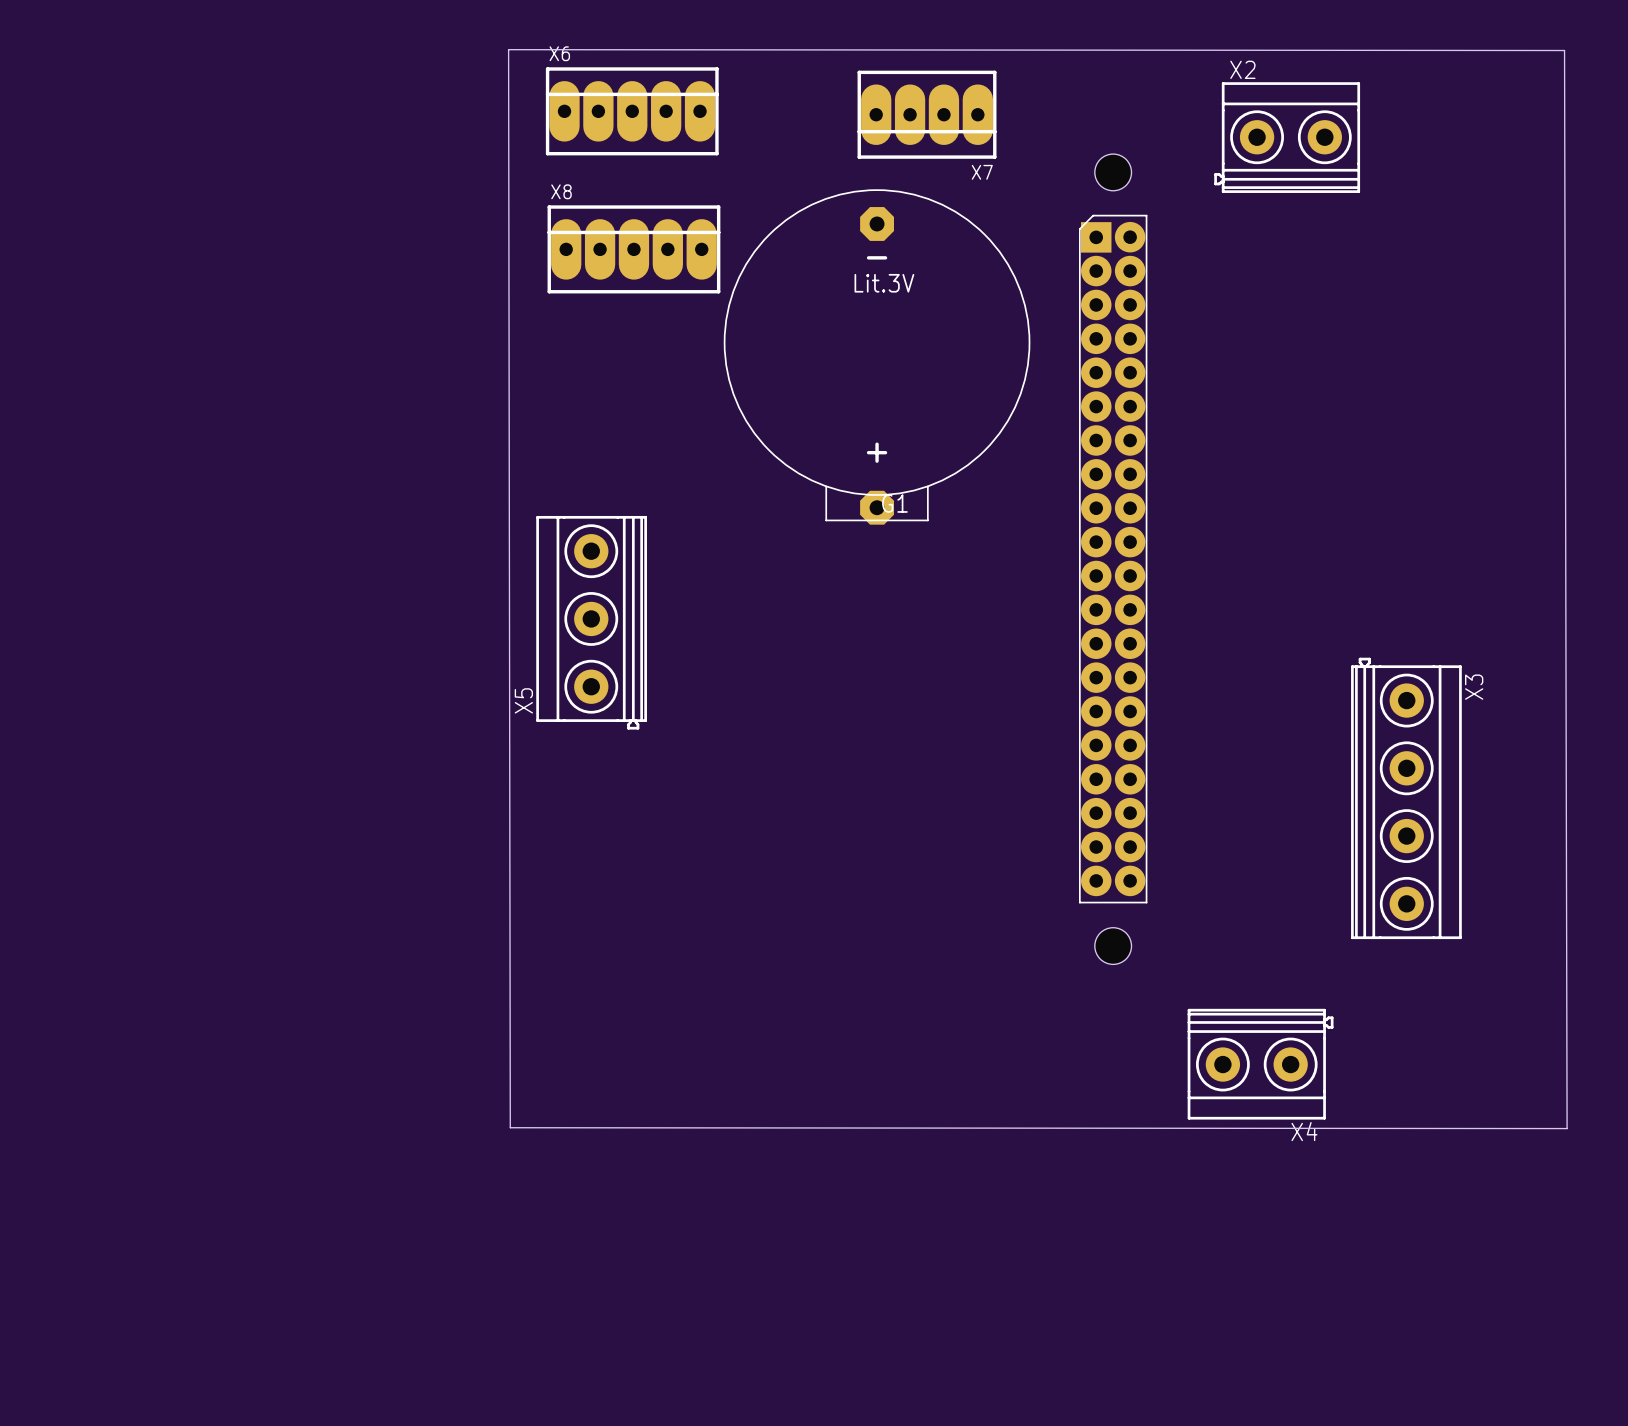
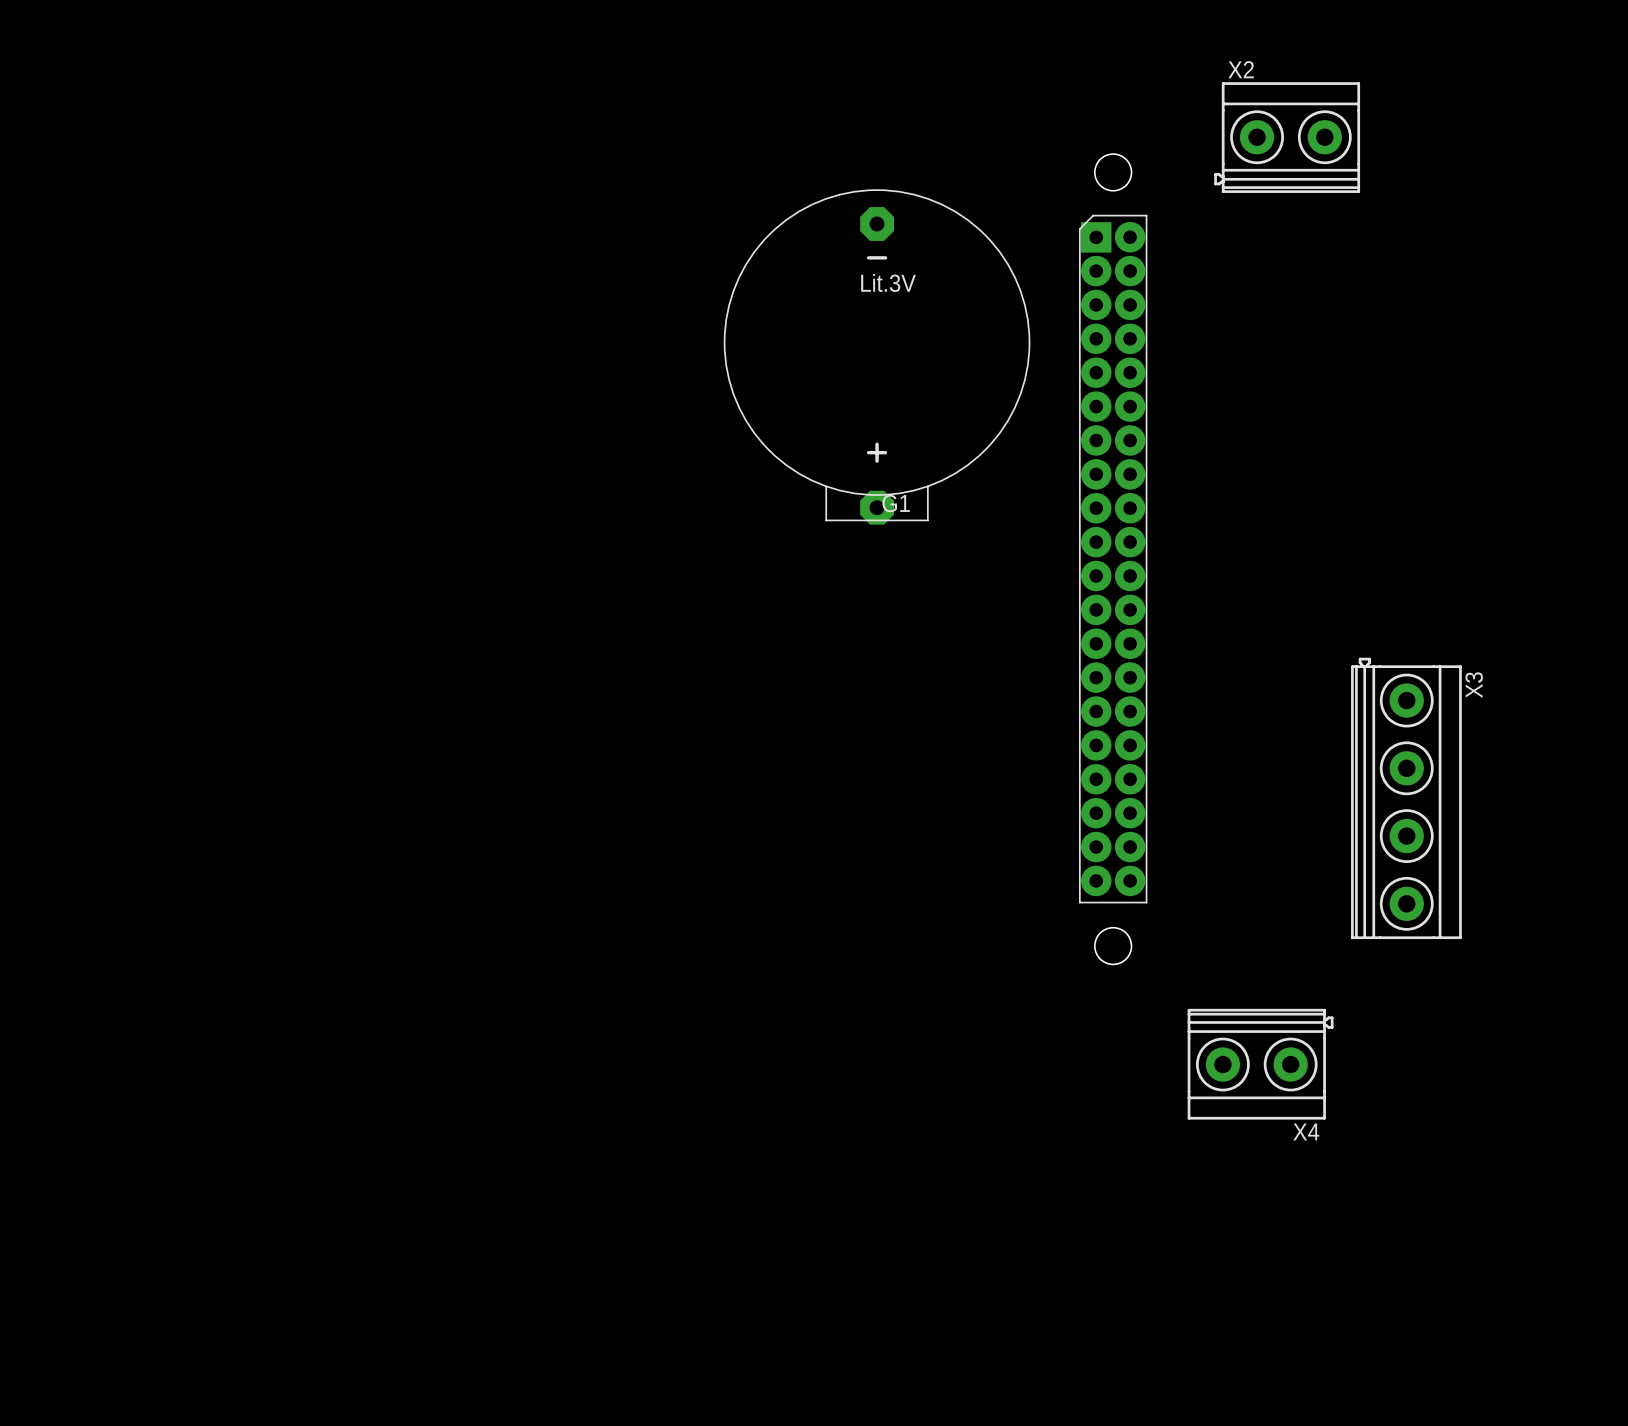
board edge: (508, 49) (1564, 50) (1567, 1128) (510, 1127) (508, 49) -> none
X6: (632, 111) -> none
X7: (927, 114) -> none
X8: (633, 249) -> none
X5: (591, 622) -> none

